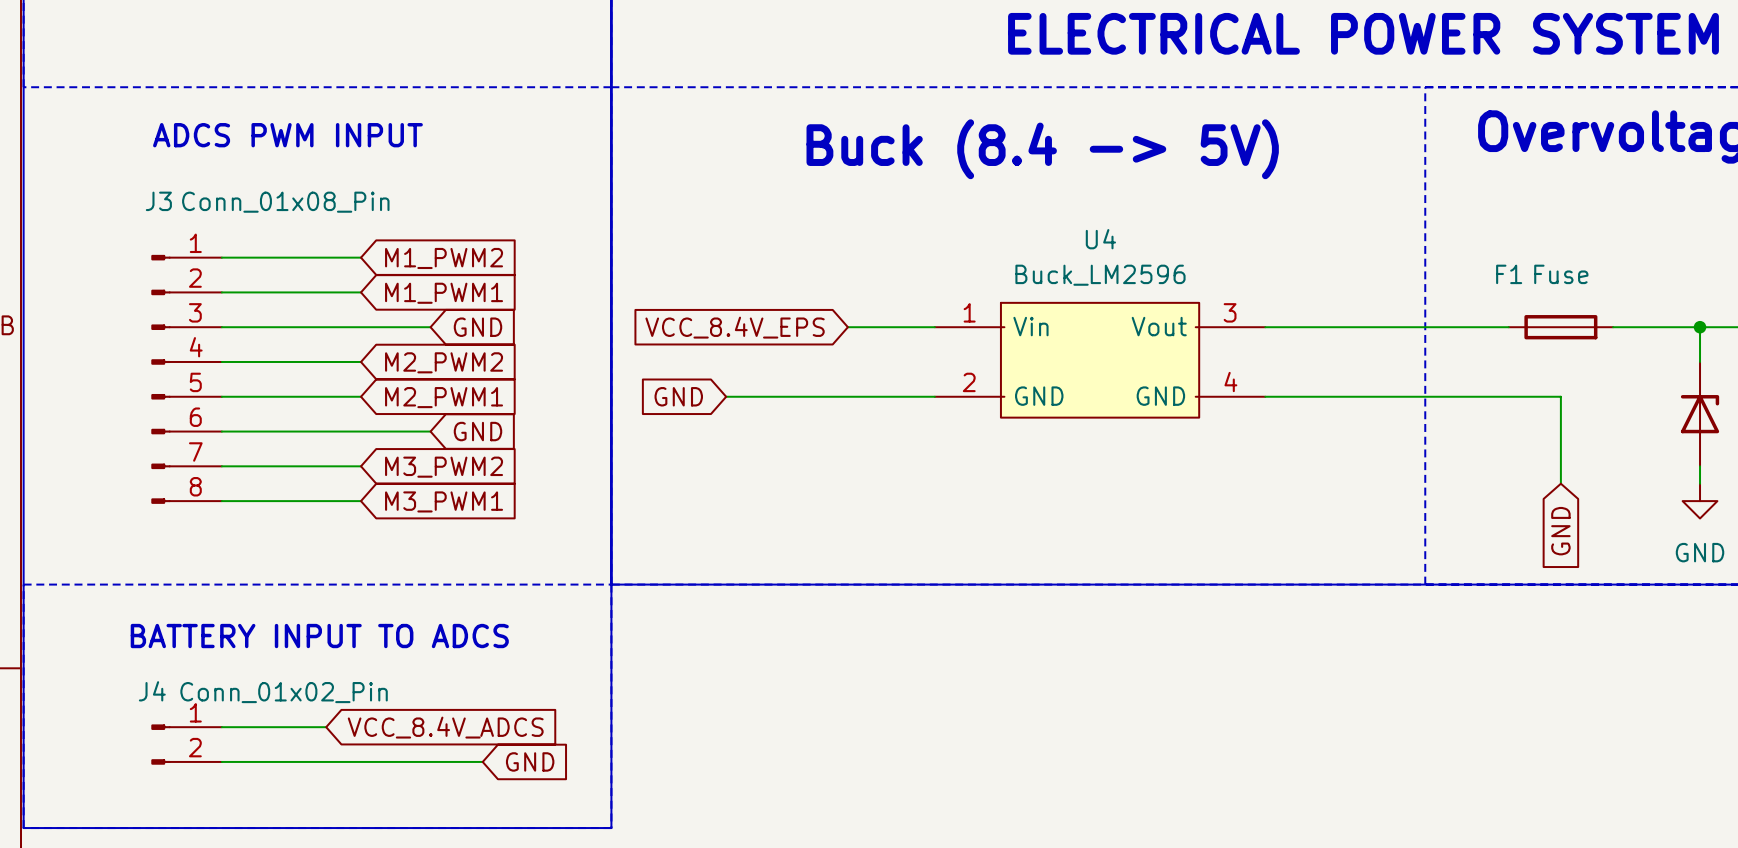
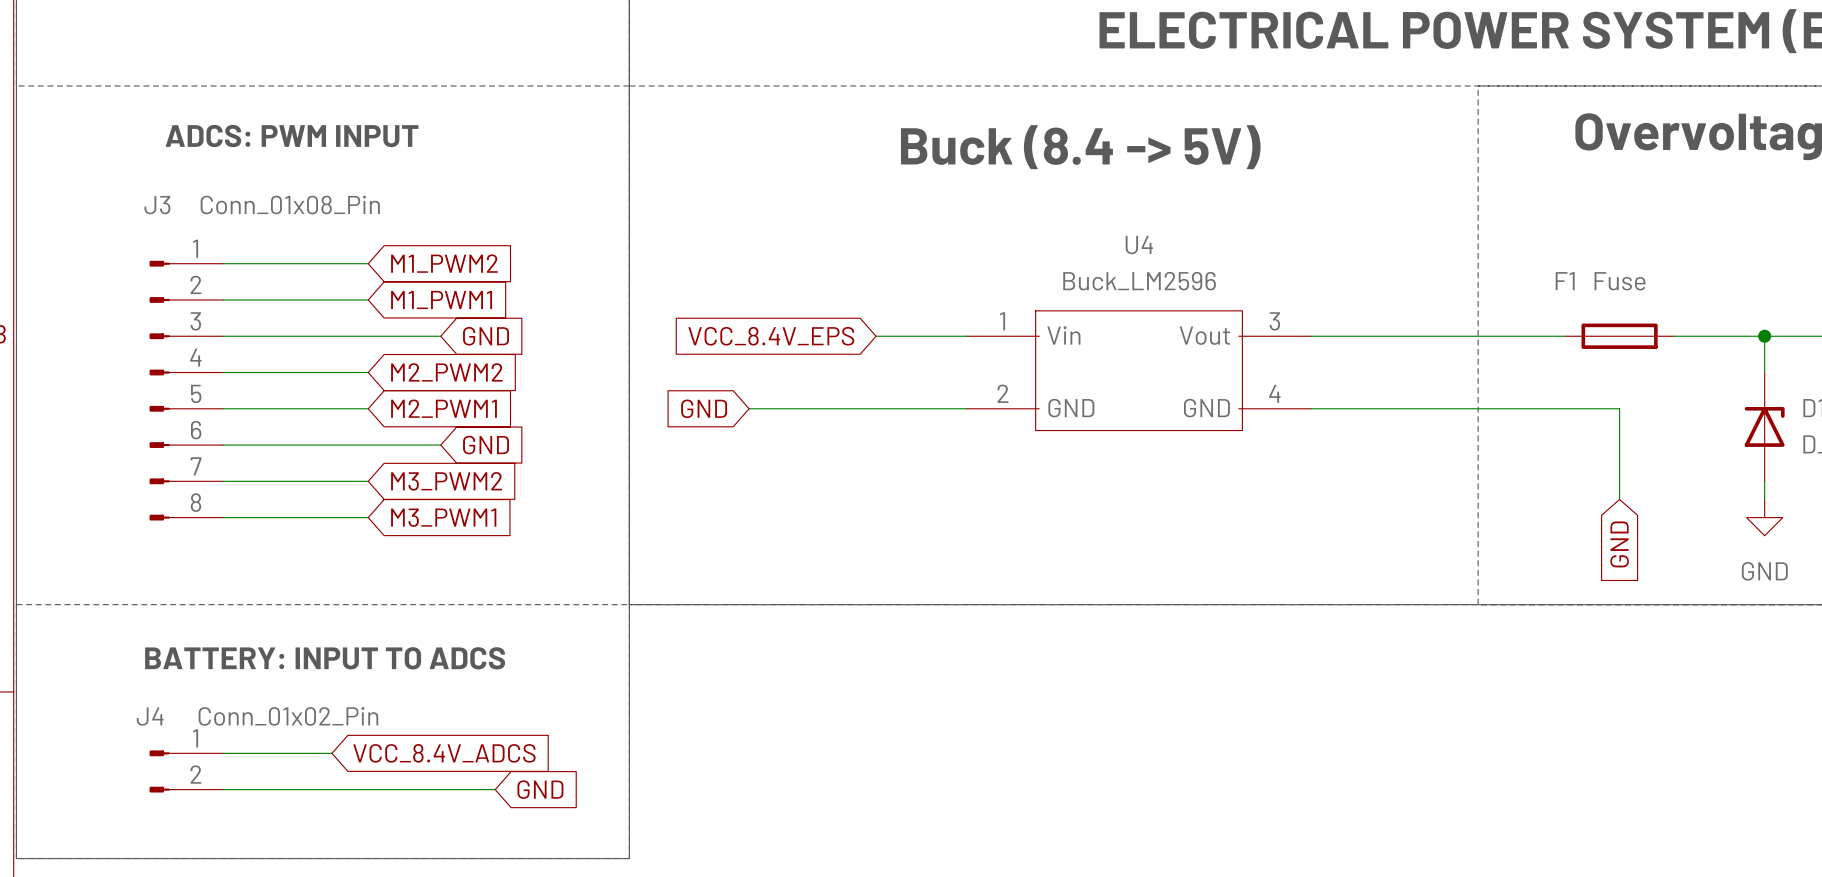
text: ADCS PWM INPUT (287, 135) -> ADCS: PWM INPUT (292, 136)
text: BATTERY INPUT TO ADCS (319, 636) -> BATTERY: INPUT TO ADCS (325, 658)

